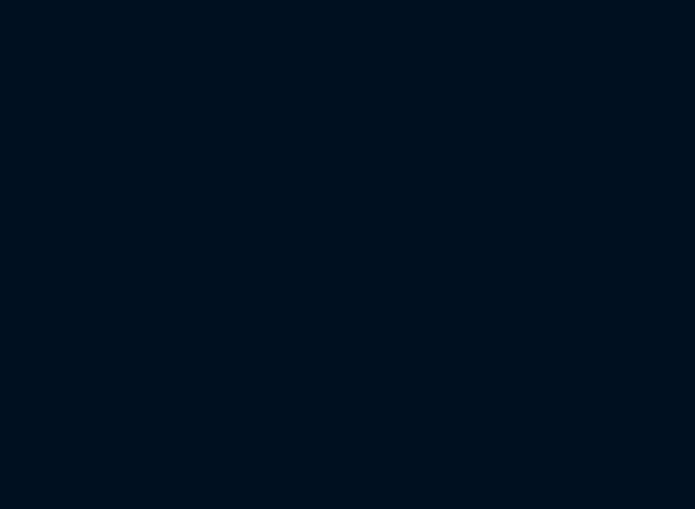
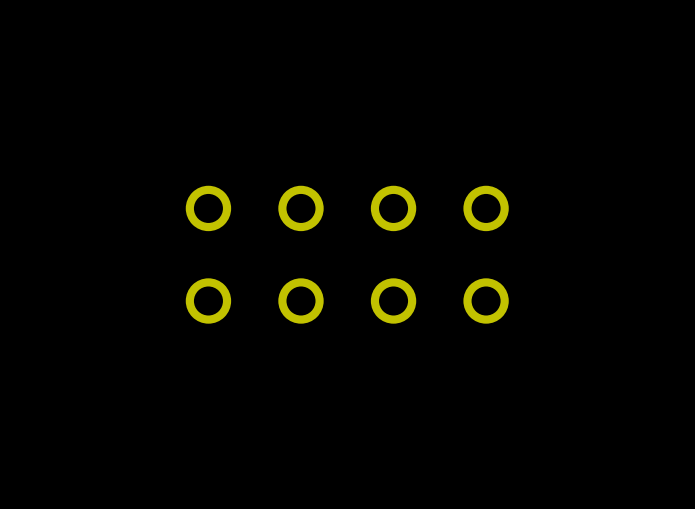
part: none -> (208, 208)
part: none -> (300, 208)
part: none -> (393, 208)
part: none -> (486, 208)
part: none -> (208, 300)
part: none -> (300, 300)
part: none -> (393, 300)
part: none -> (486, 300)

